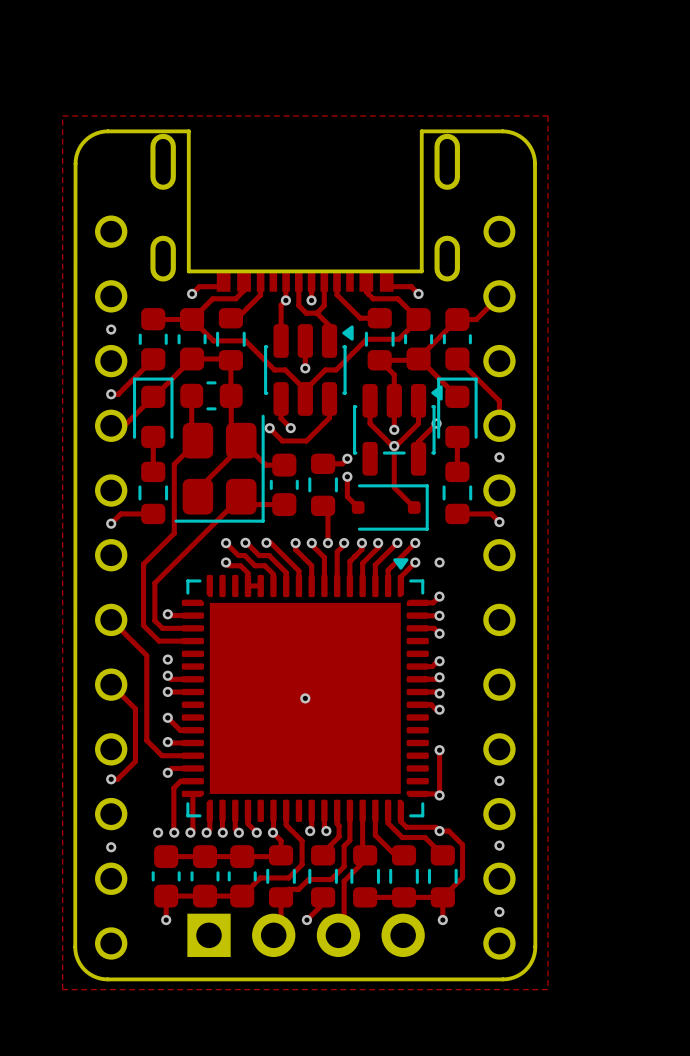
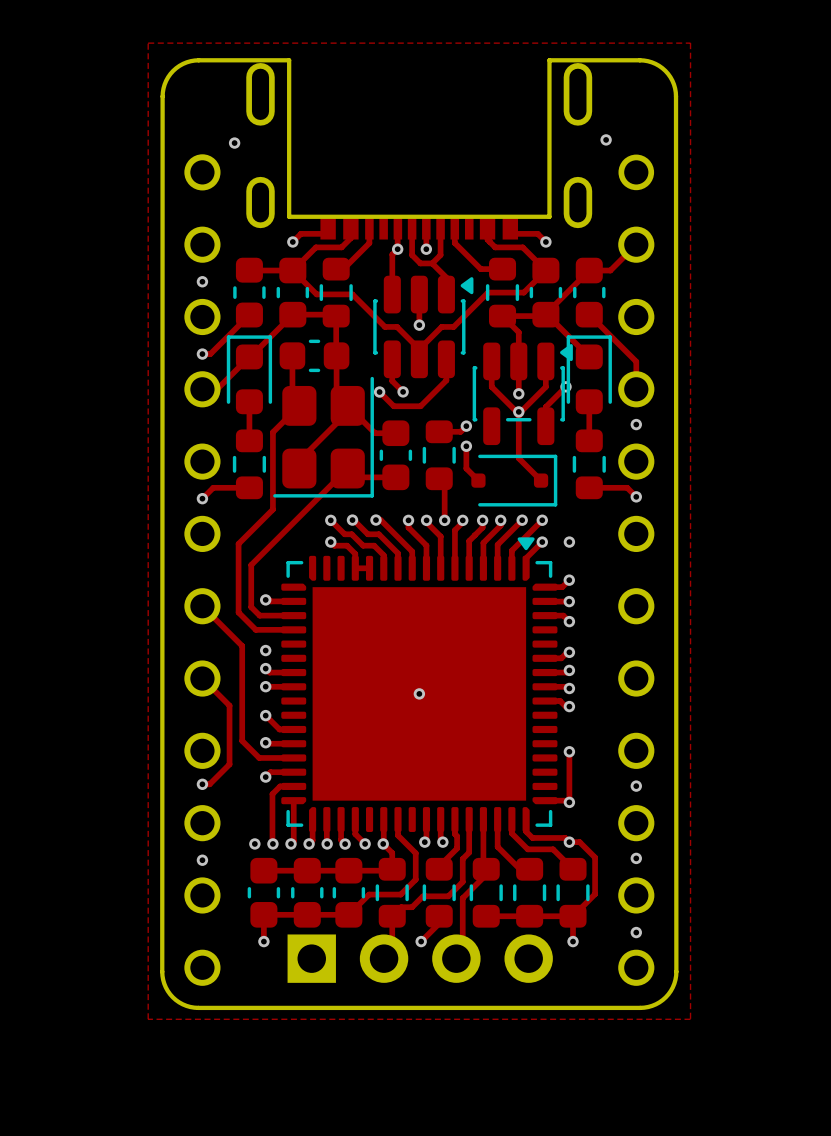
via: none -> (606, 139)
via: none -> (234, 143)

